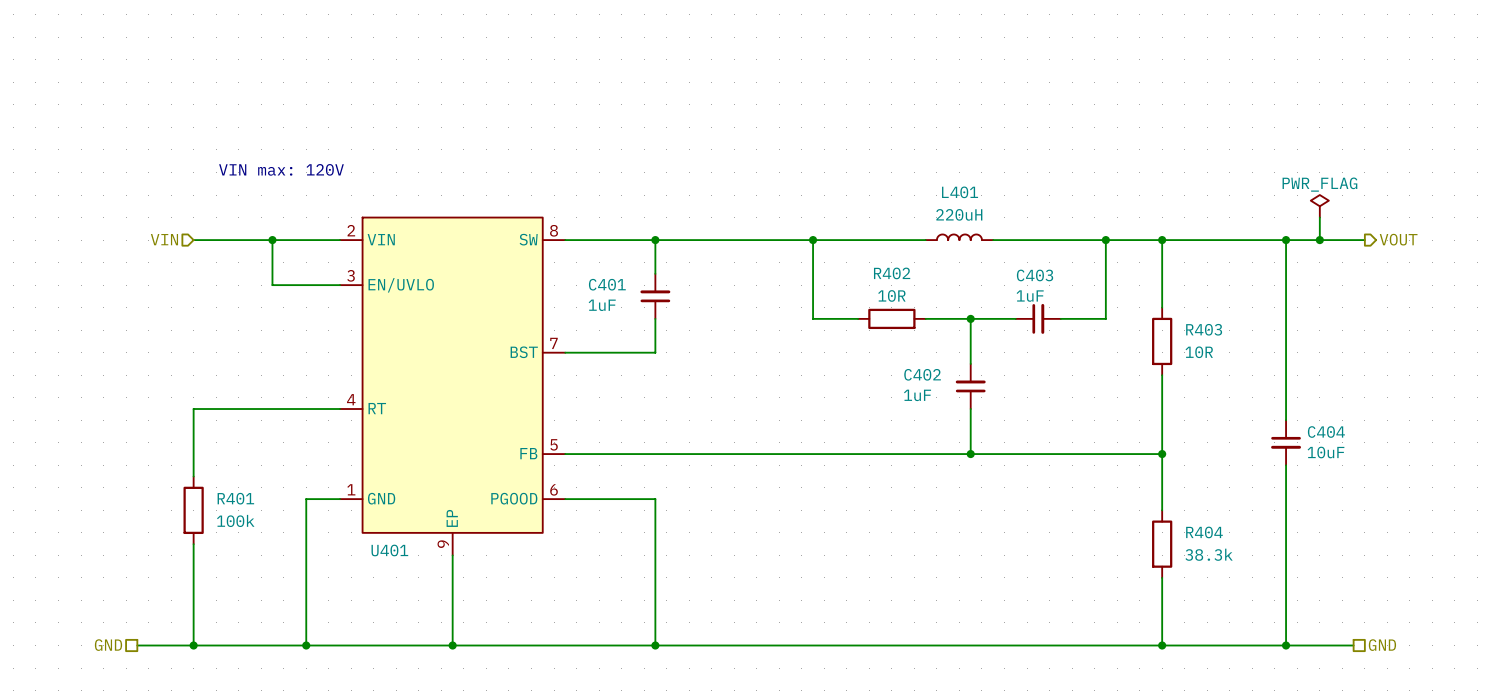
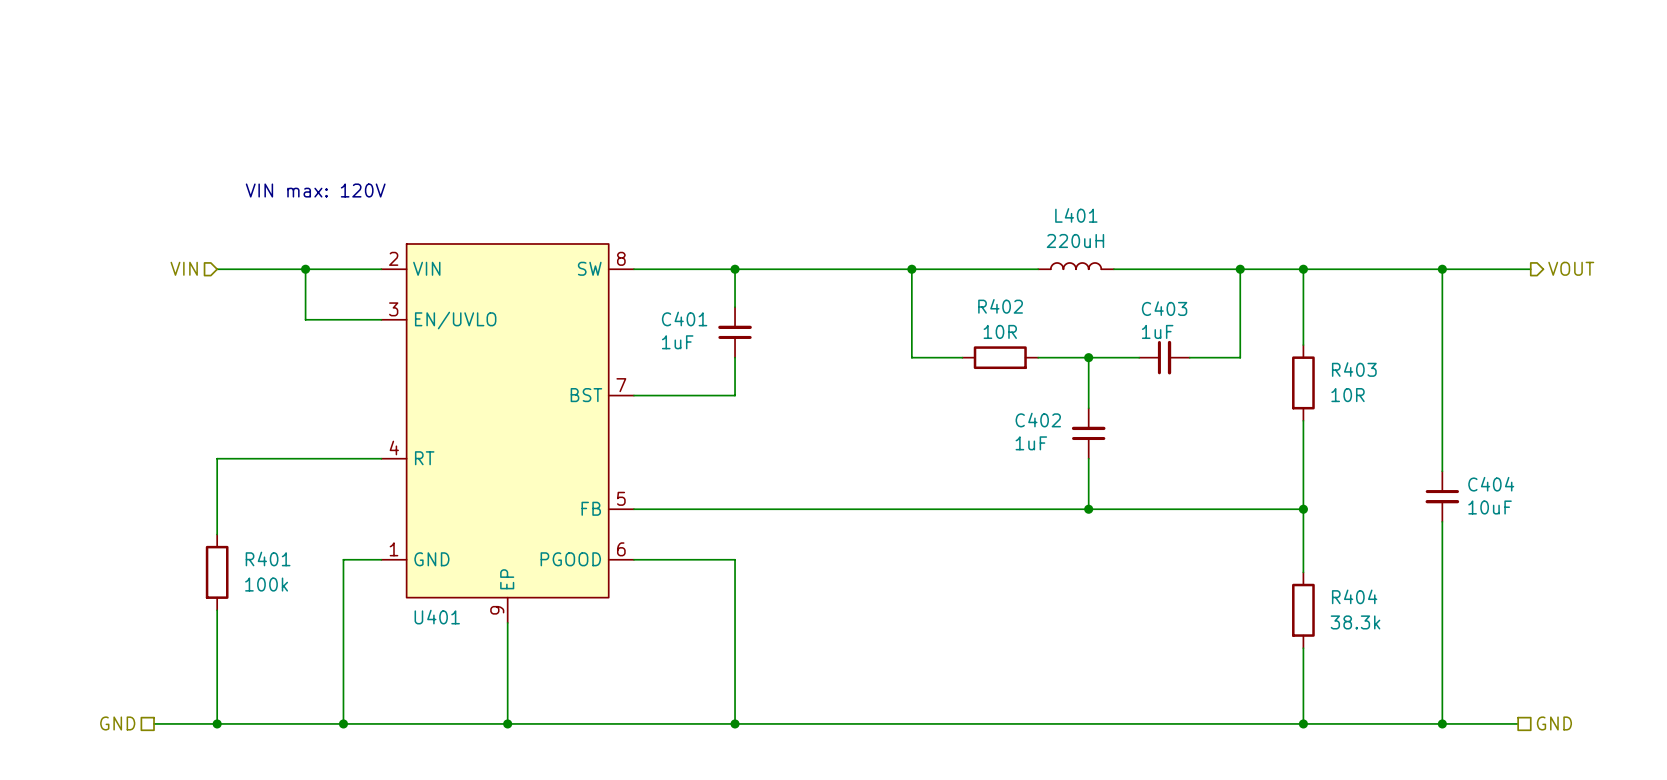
power symbol: PWR_FLAG (1319, 206) -> none
wire: (1319, 217) (1319, 240) -> none
junction: (1319, 240) -> none

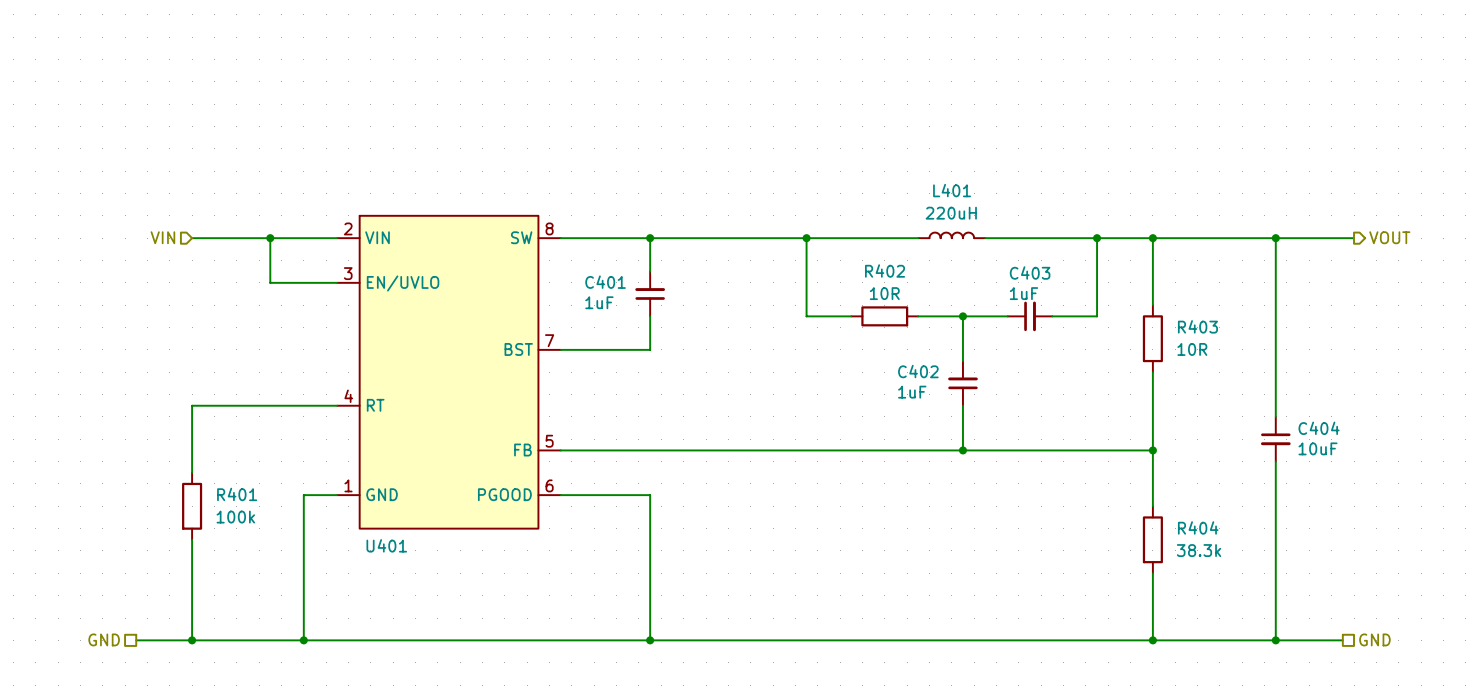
text: VIN max: 120V (315, 190) -> none
U401 symbol: [381, 243, 634, 623] -> [337, 215, 561, 529]
wire: (507, 622) (507, 723) -> none
junction: (507, 723) -> none

